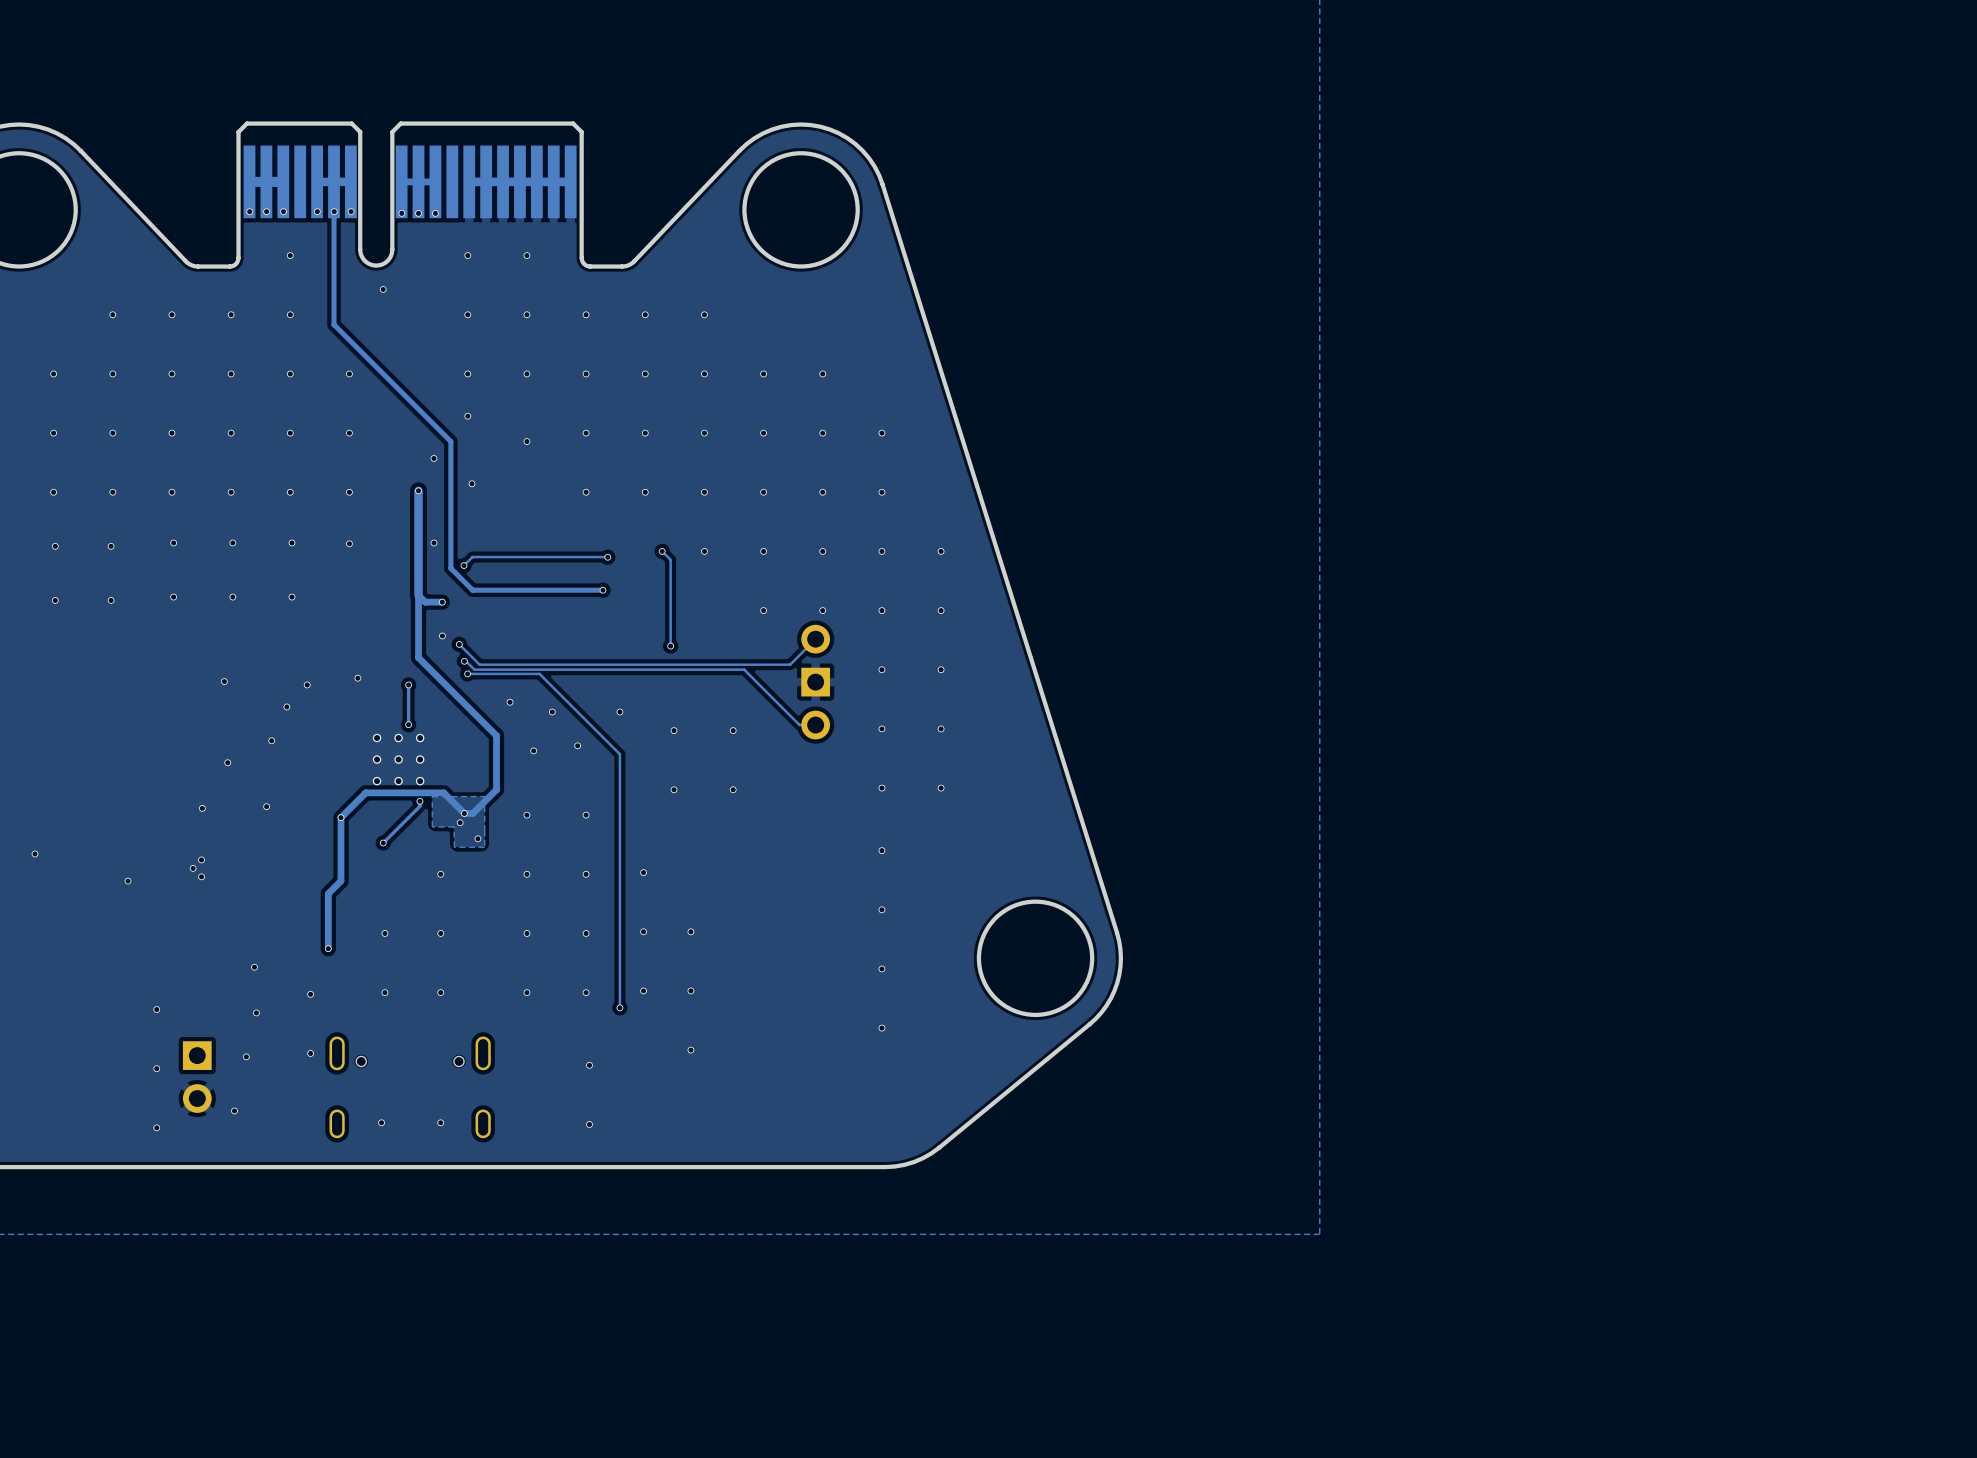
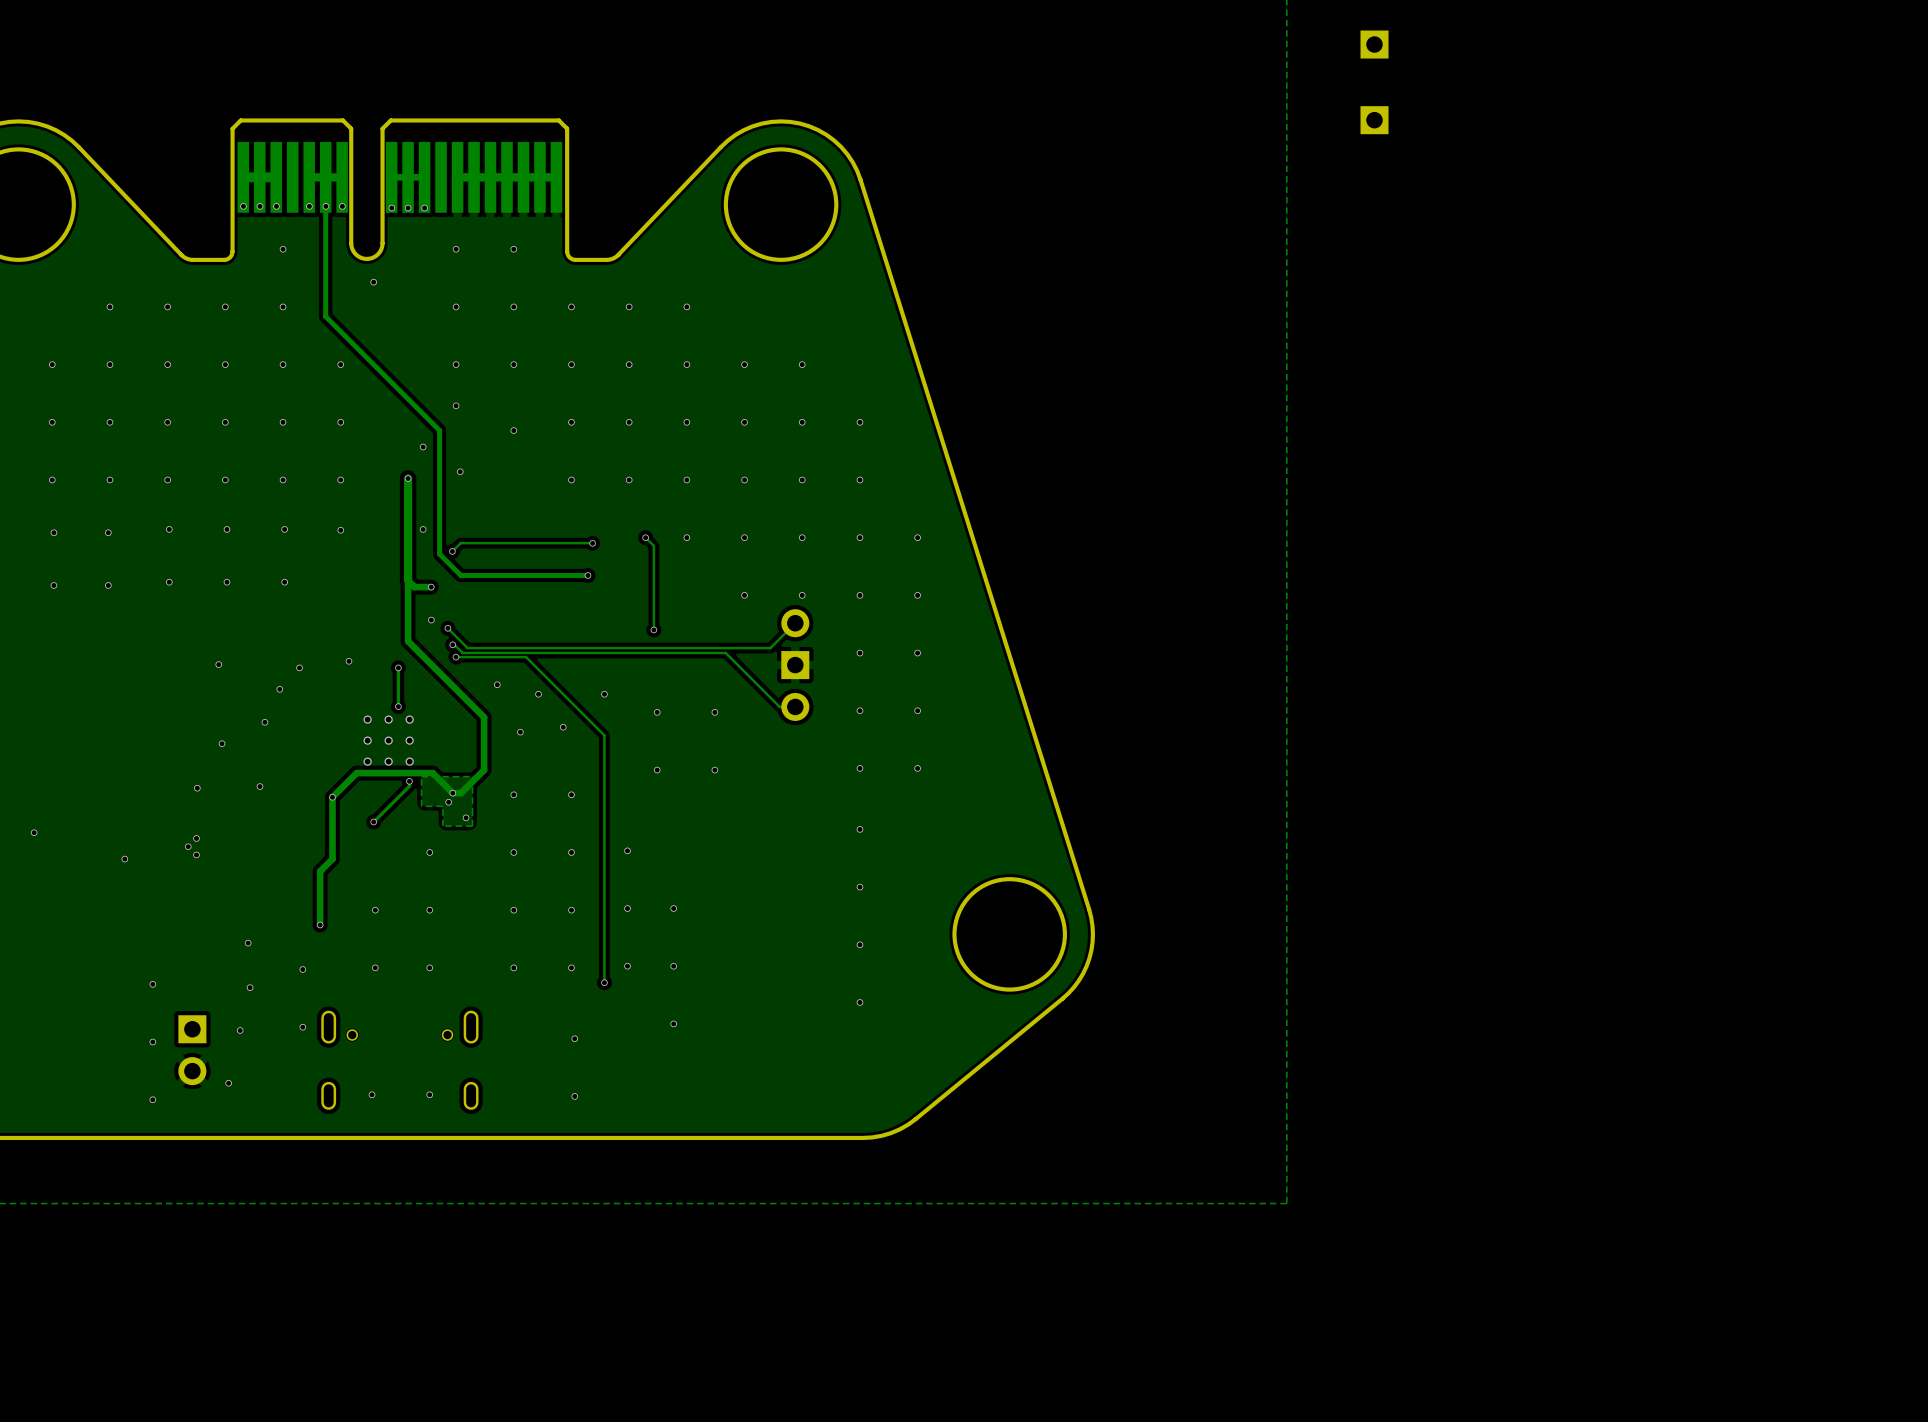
part: none -> (1374, 44)
part: none -> (1374, 120)

